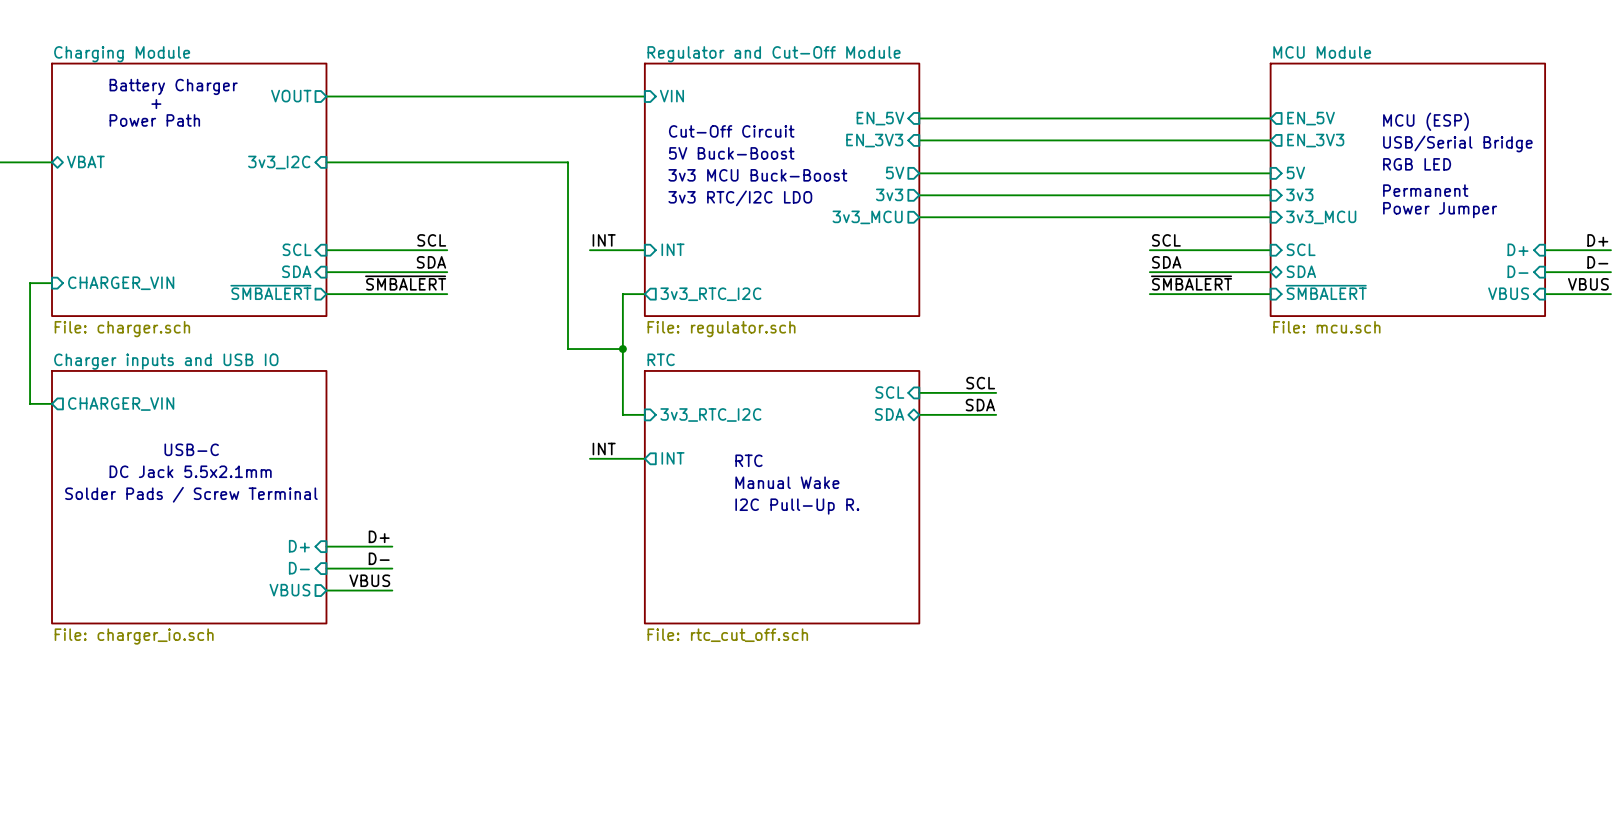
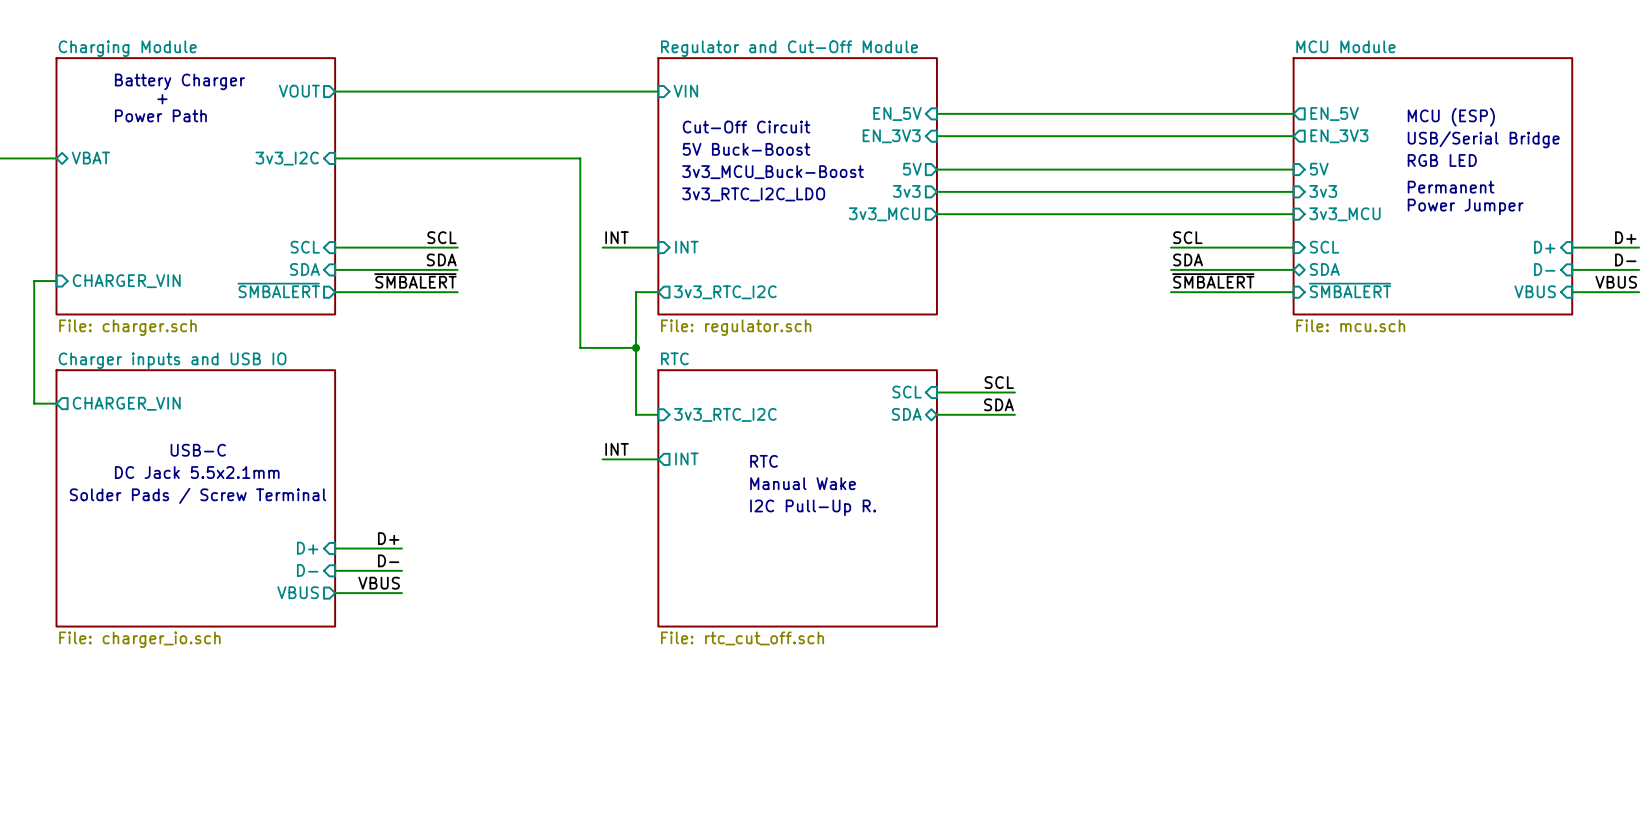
text: 3v3 MCU Buck-Boost (757, 175) -> 3v3_MCU_Buck-Boost (773, 172)
text: 3v3 RTC/I2C LDO (740, 198) -> 3v3_RTC_I2C_LDO (753, 194)

